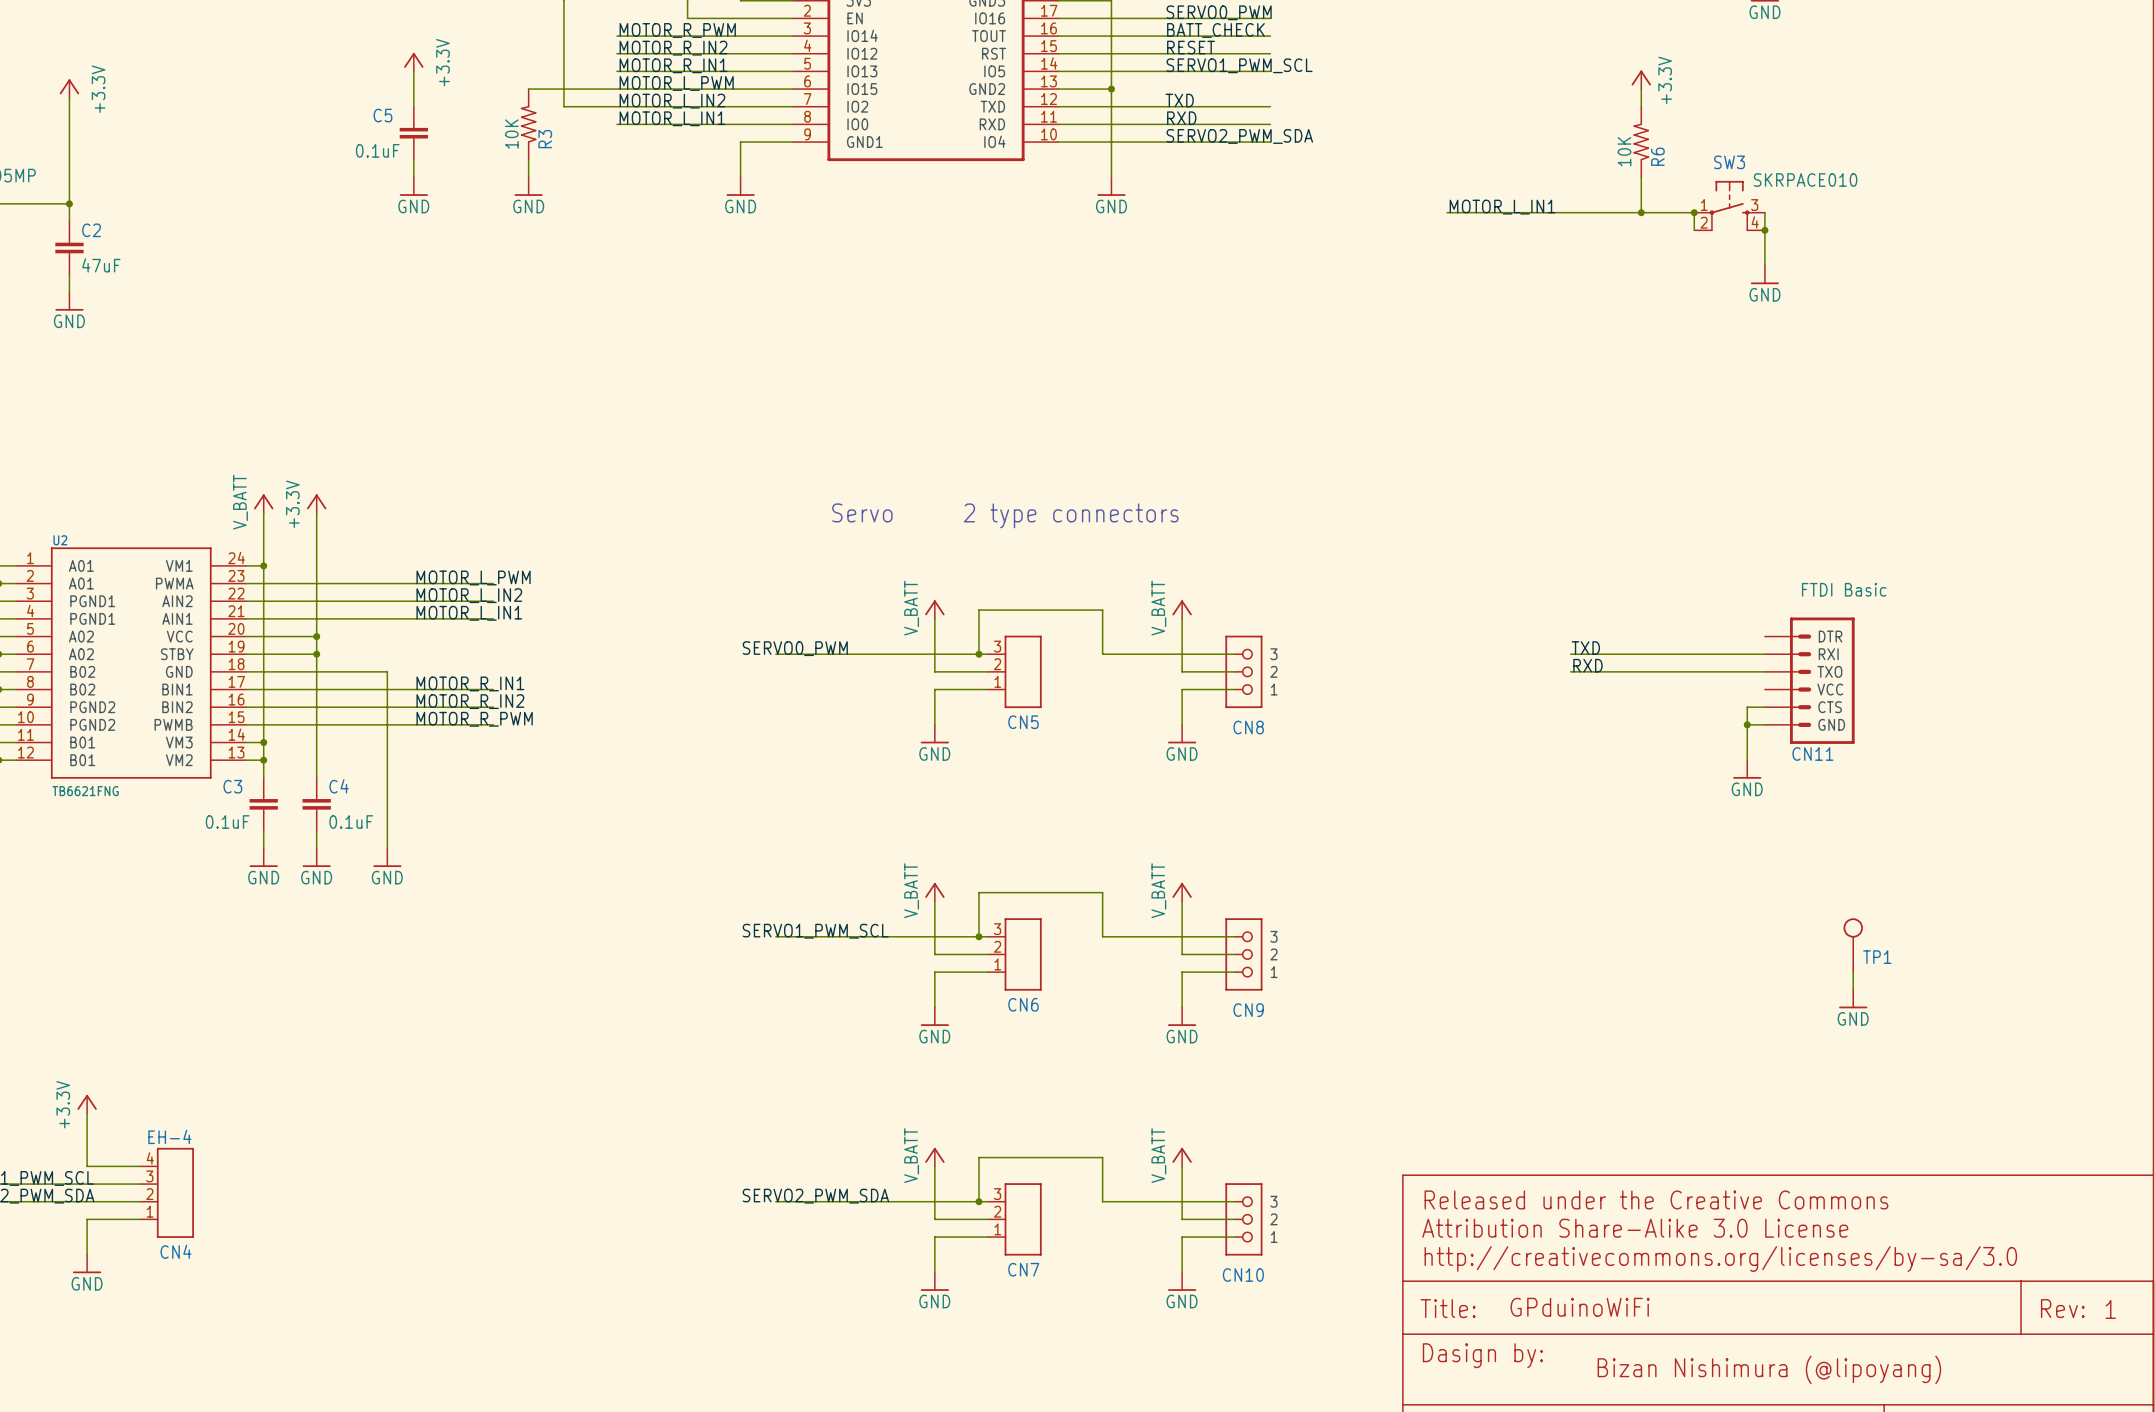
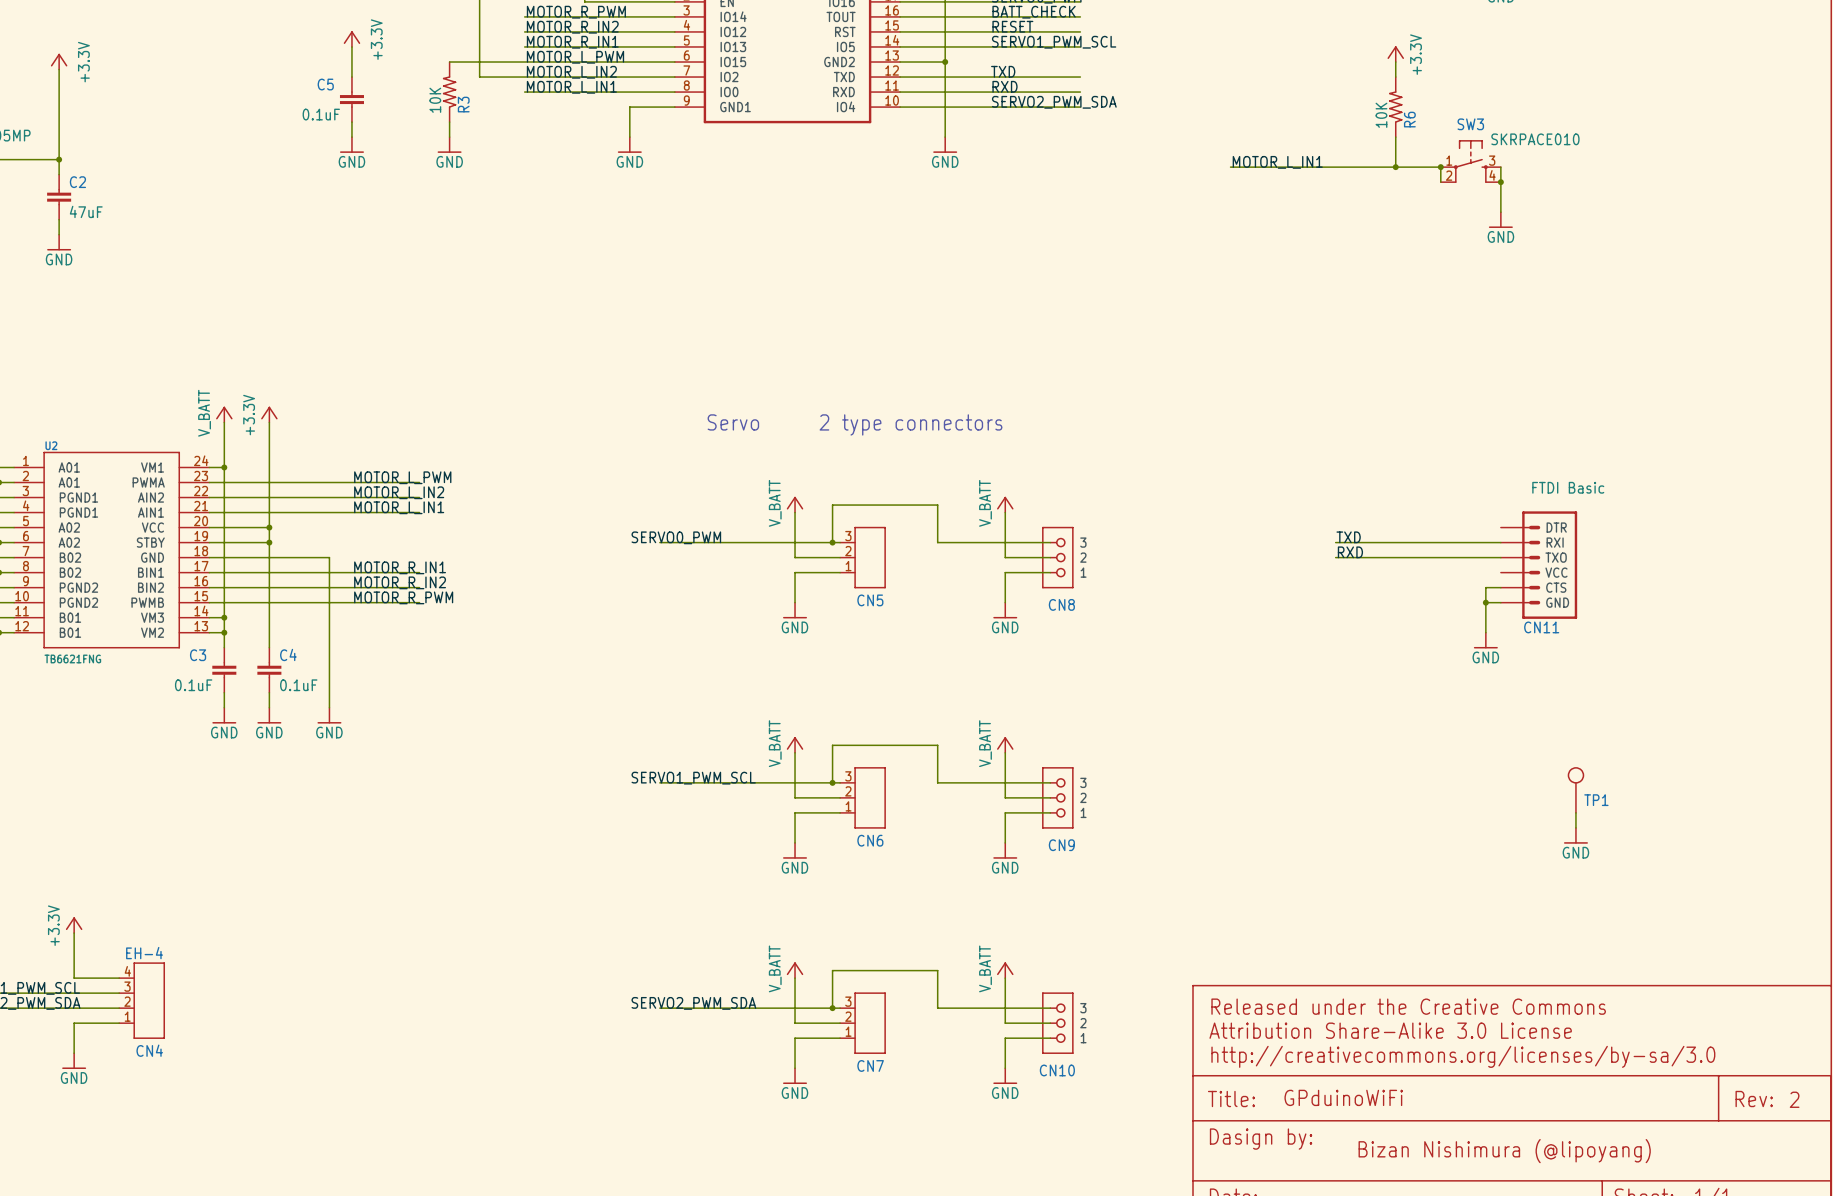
text: 1 (2110, 1309) -> 2 (1794, 1099)

